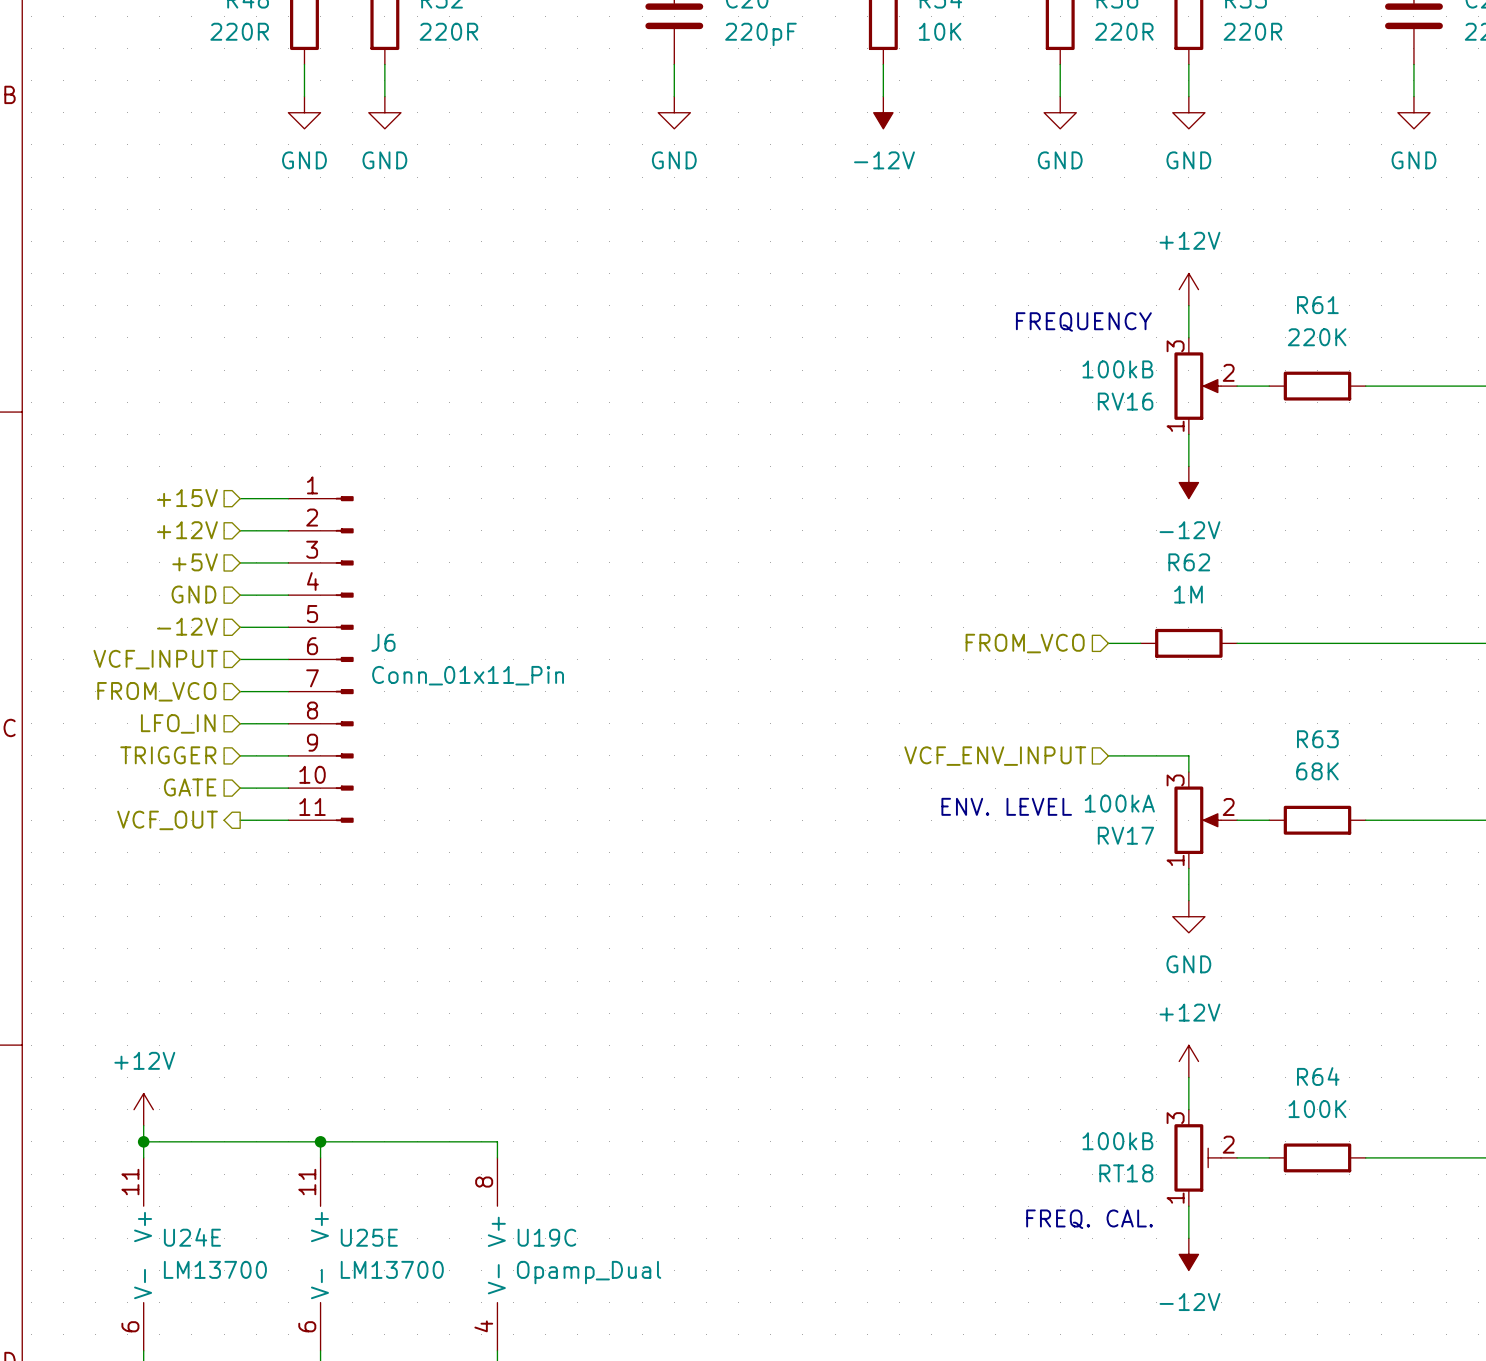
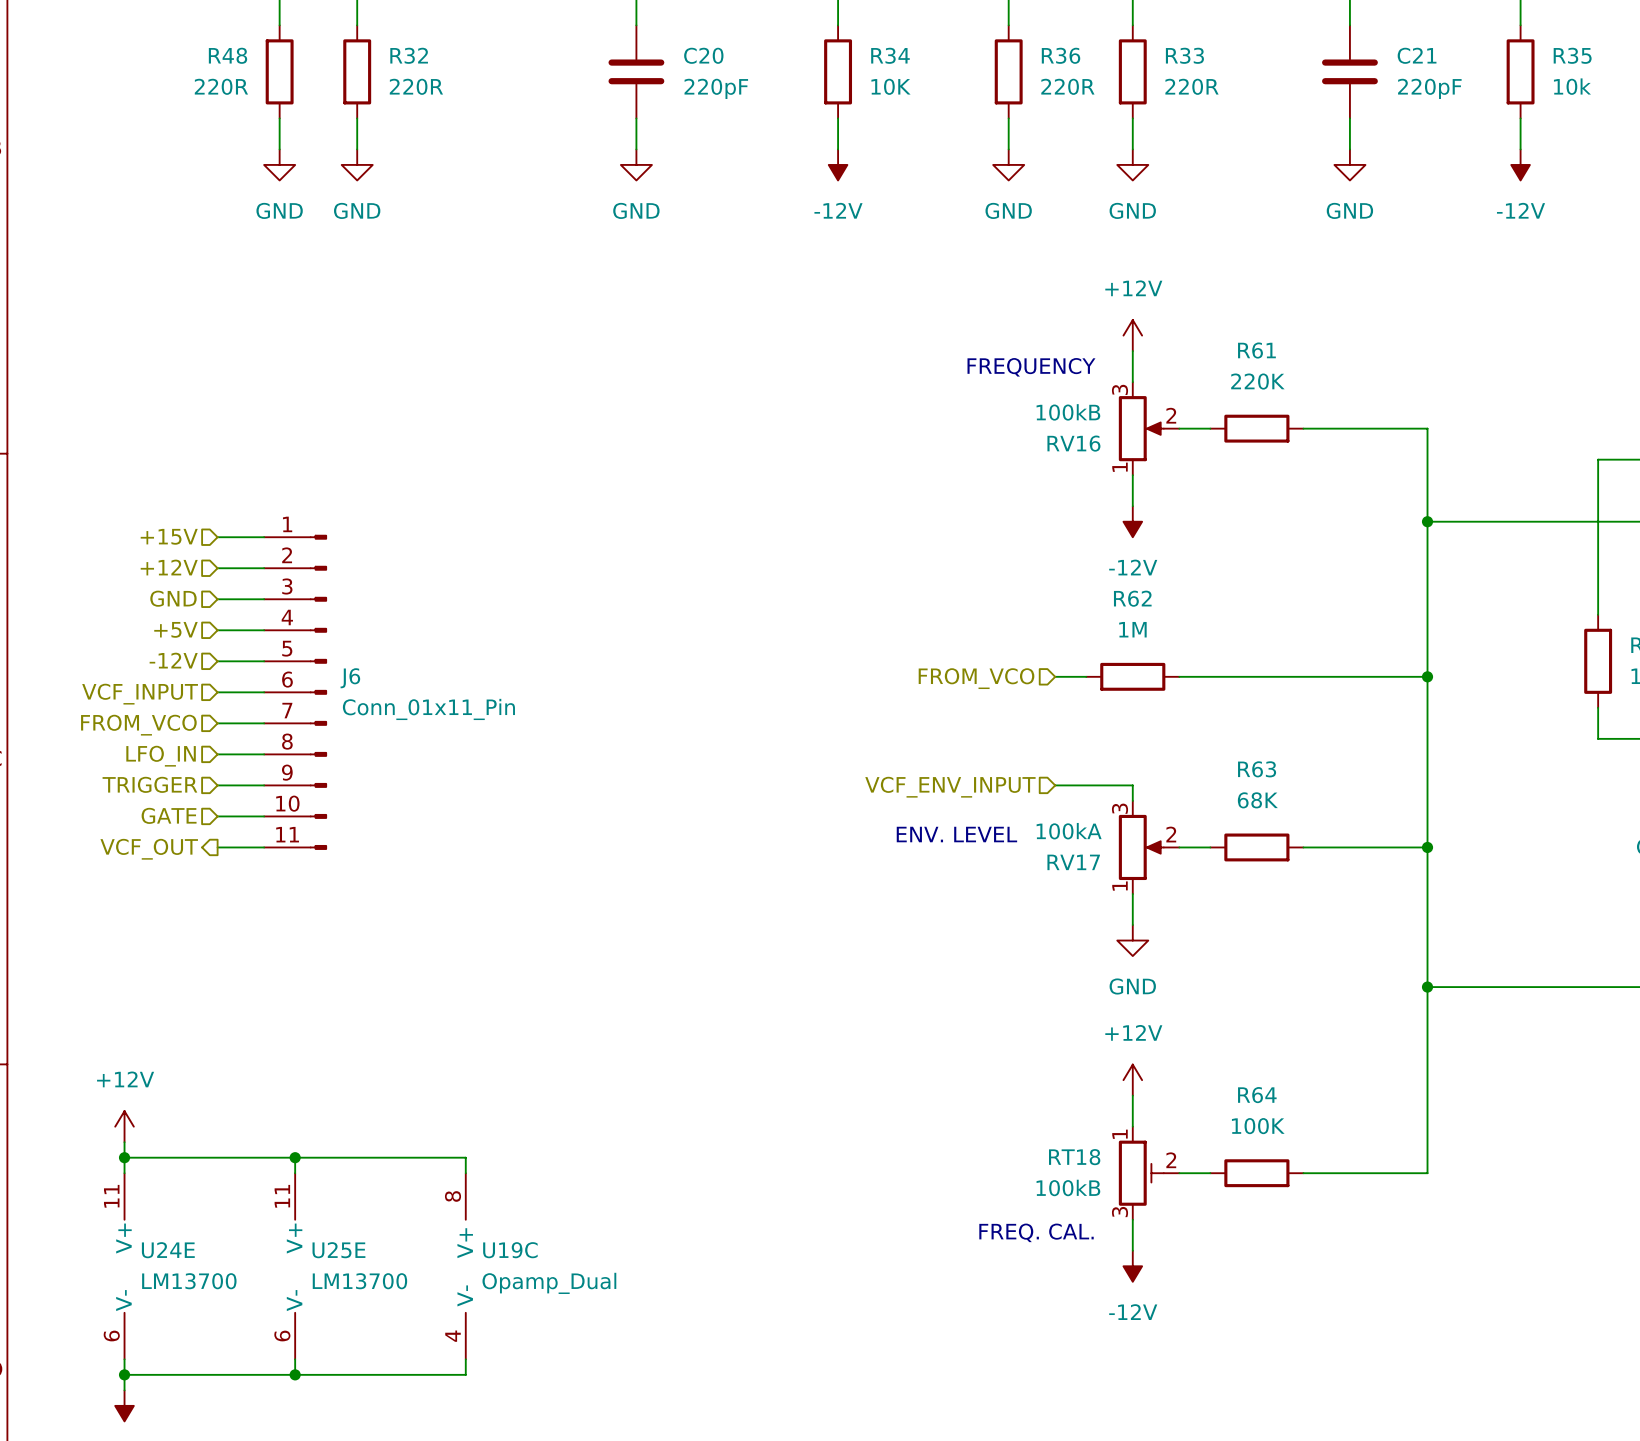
hierarchical label: +5V (195, 562) -> GND (173, 598)
hierarchical label: GND (193, 594) -> +5V (175, 629)
RT18 flip: as is (1197, 1157) -> up-down (1141, 1173)

